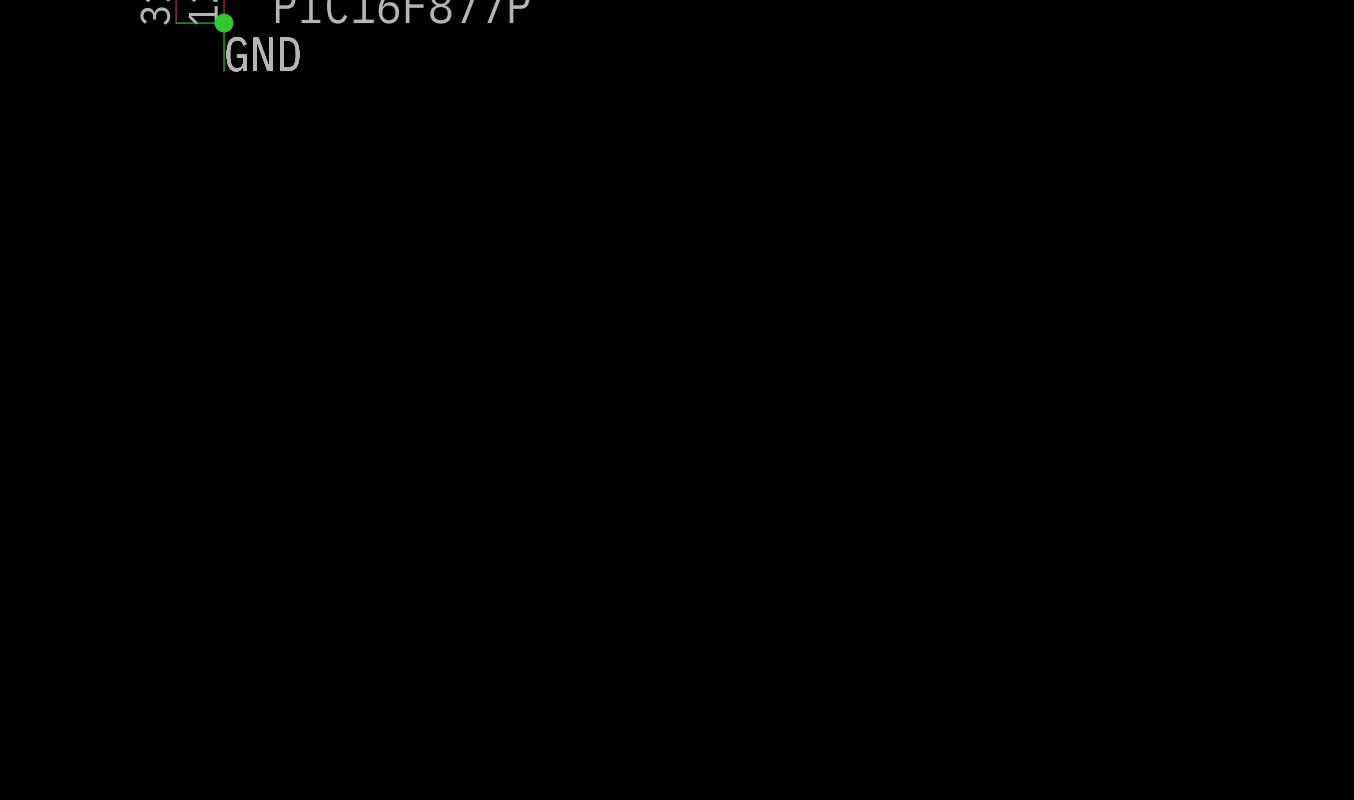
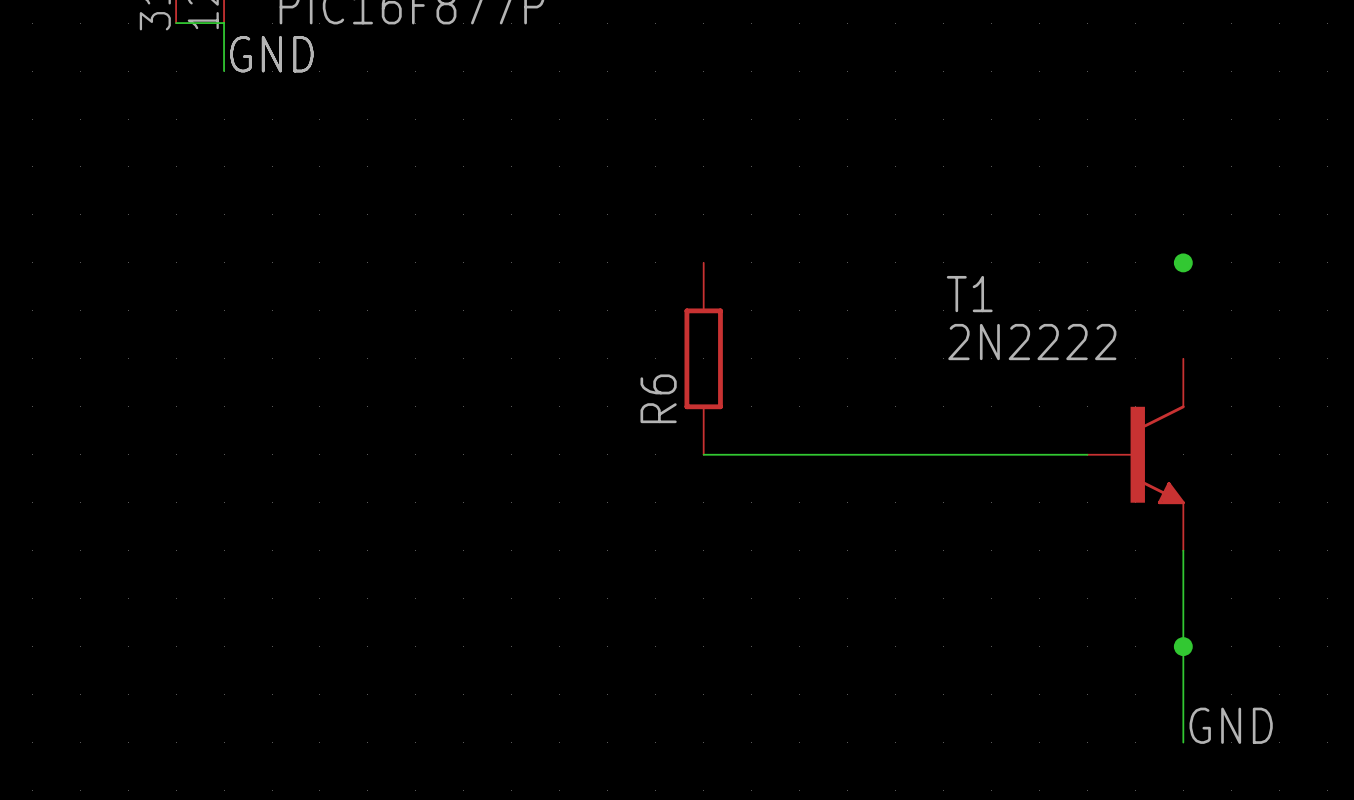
junction: (224, 23) -> none
junction: none -> (1183, 262)
R6: none -> (703, 358)
wire: none -> (703, 454) (1087, 454)
T1: none -> 2N2222 (1136, 454)
wire: none -> (1183, 550) (1183, 742)
junction: none -> (1183, 646)
label: none -> GND (1231, 725)

